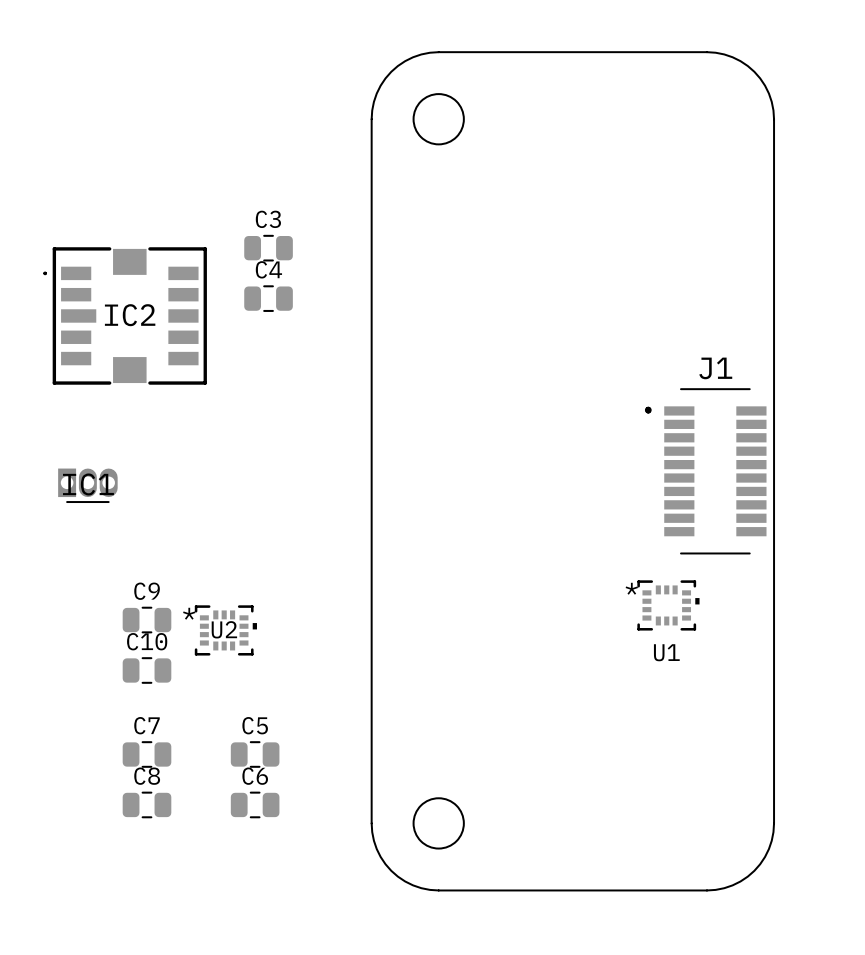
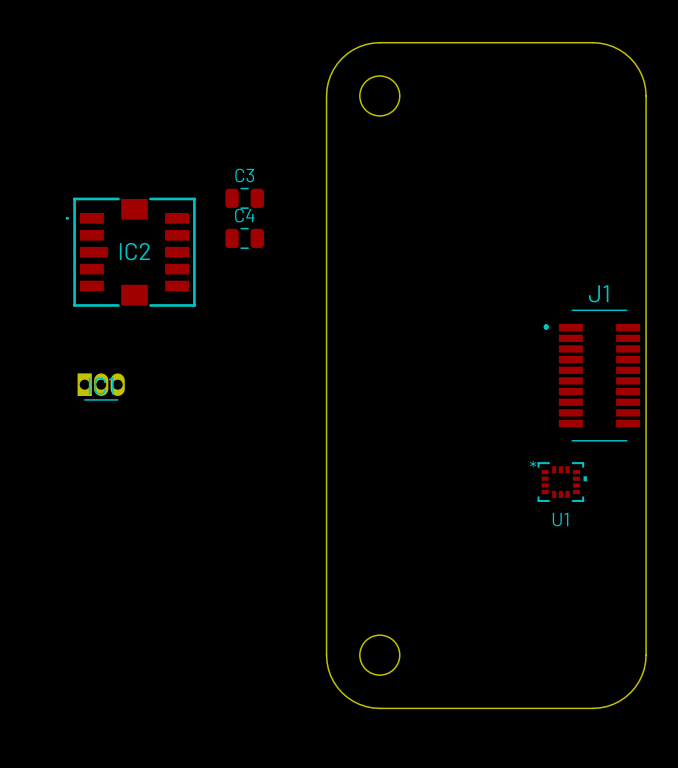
C9: (146, 620) -> none
U2: (225, 630) -> none
C10: (146, 670) -> none
C7: (146, 754) -> none
C5: (255, 754) -> none
C8: (146, 804) -> none
C6: (255, 804) -> none

